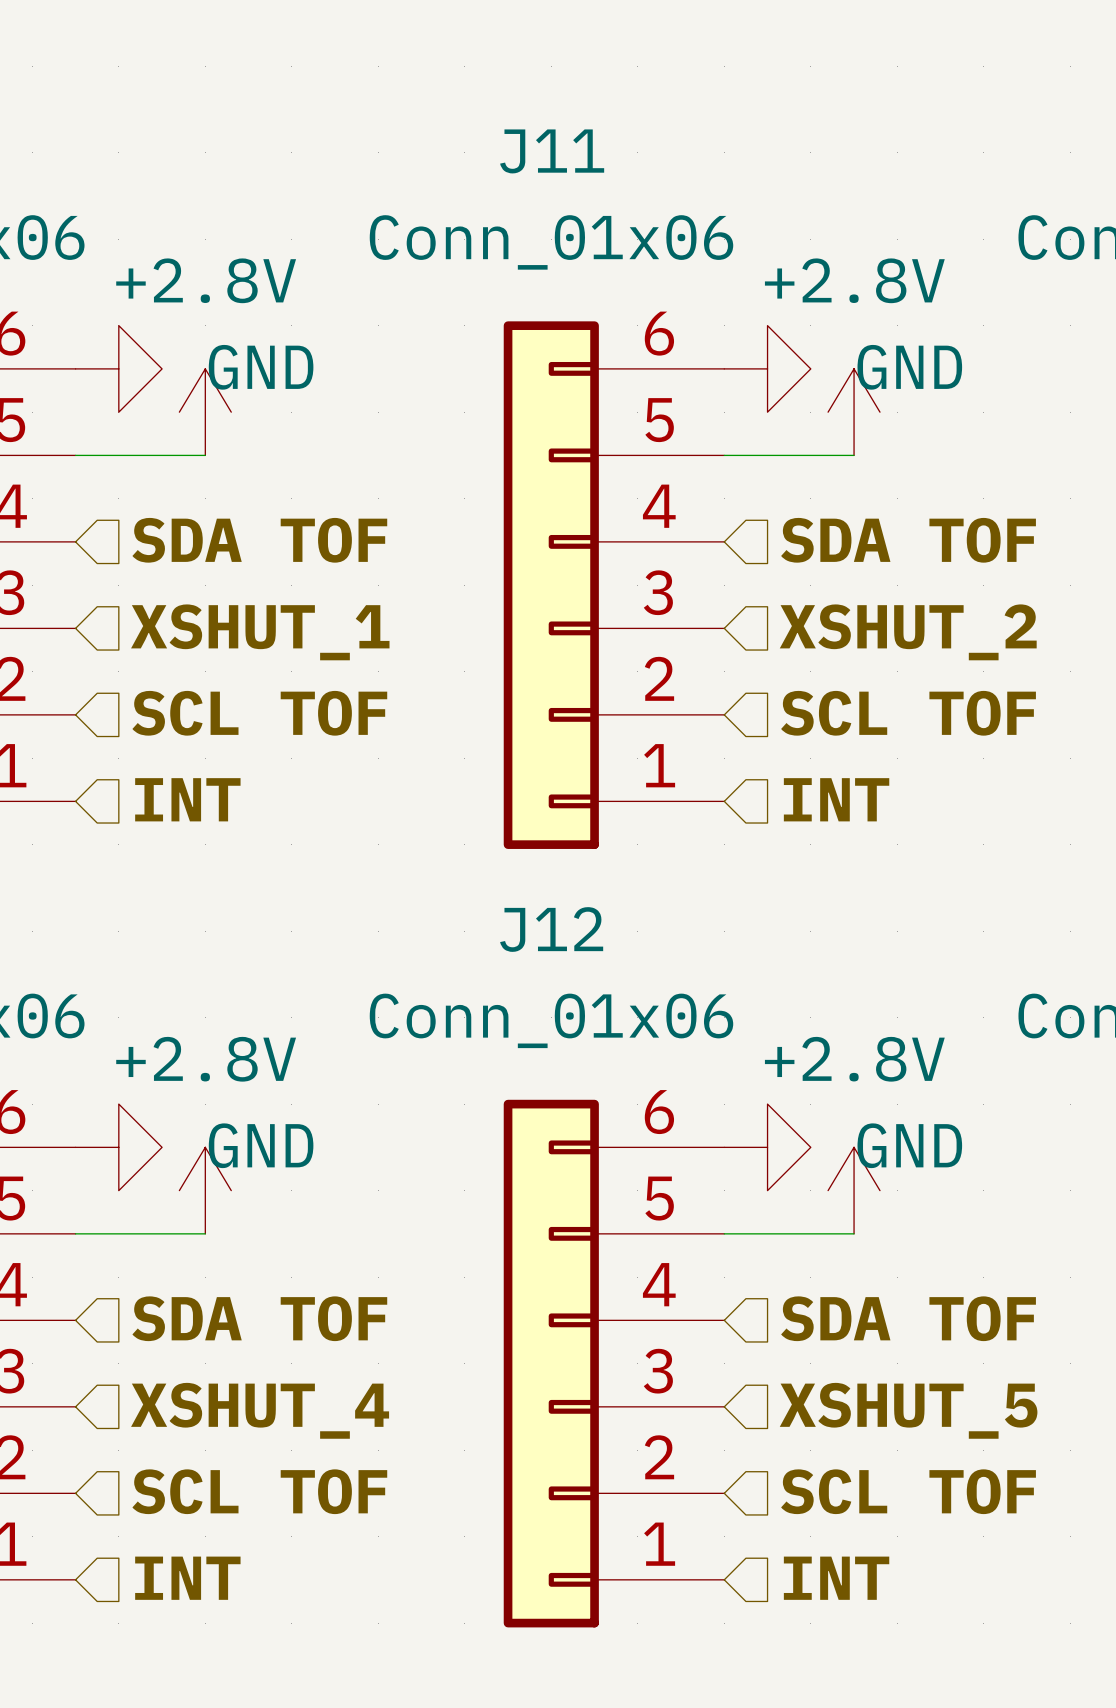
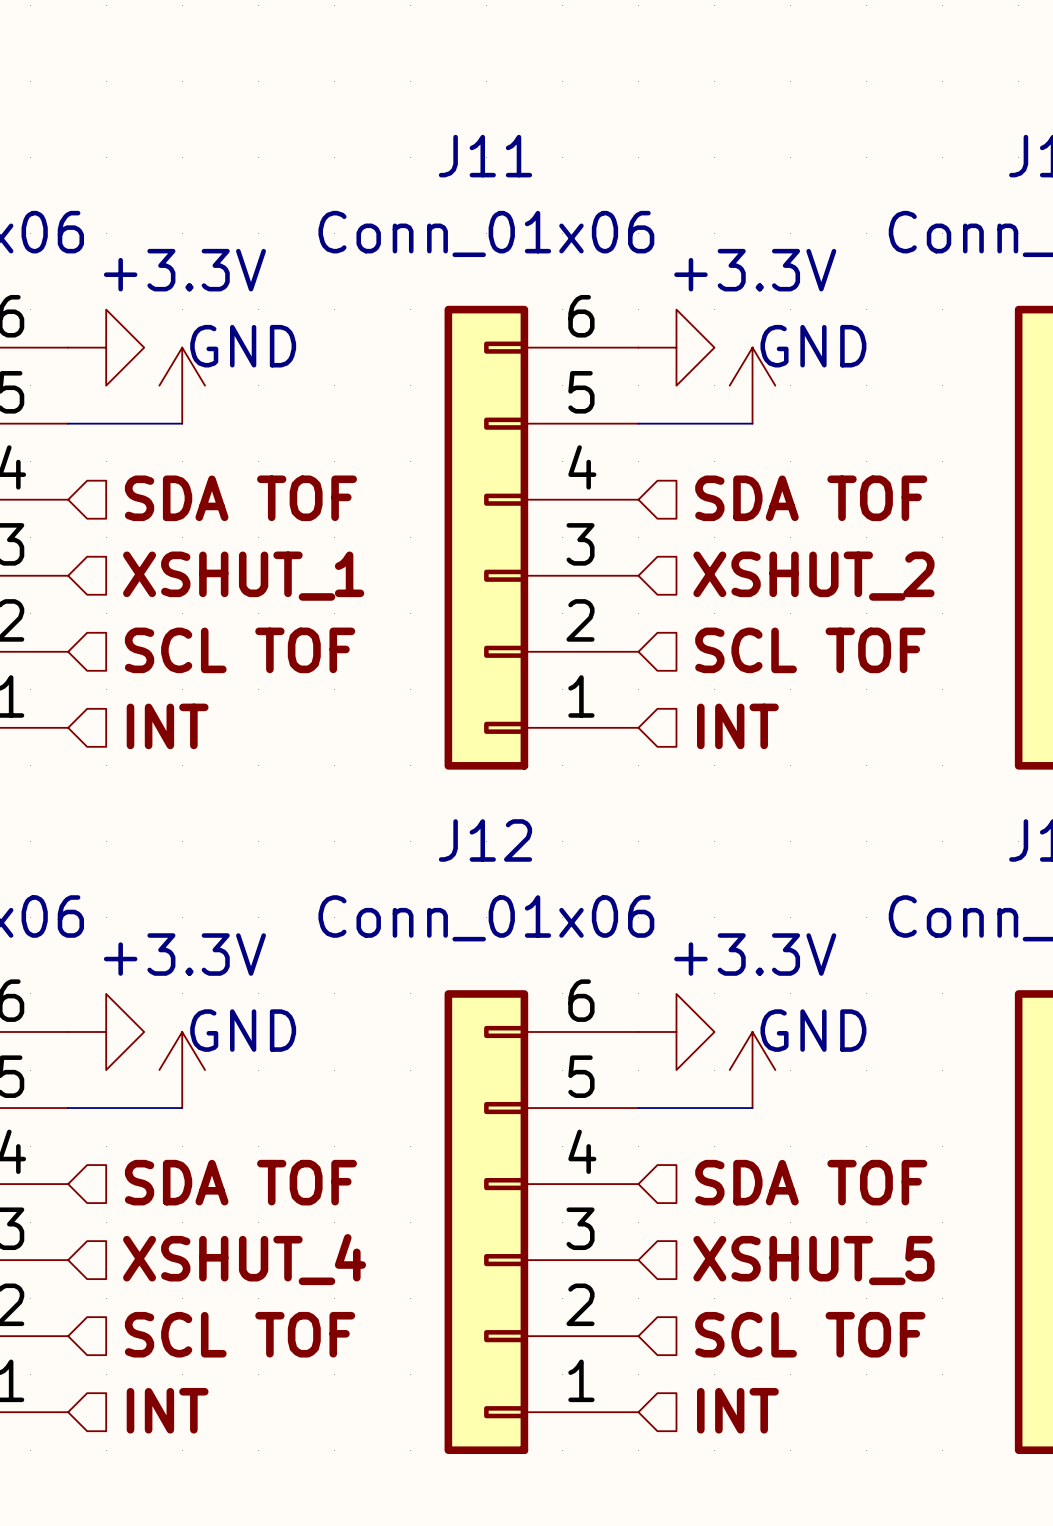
power symbol: +2.8V (205, 412) -> +3.3V (182, 385)
power symbol: +2.8V (854, 412) -> +3.3V (752, 385)
power symbol: +2.8V (205, 1190) -> +3.3V (182, 1070)
power symbol: +2.8V (854, 1190) -> +3.3V (752, 1070)

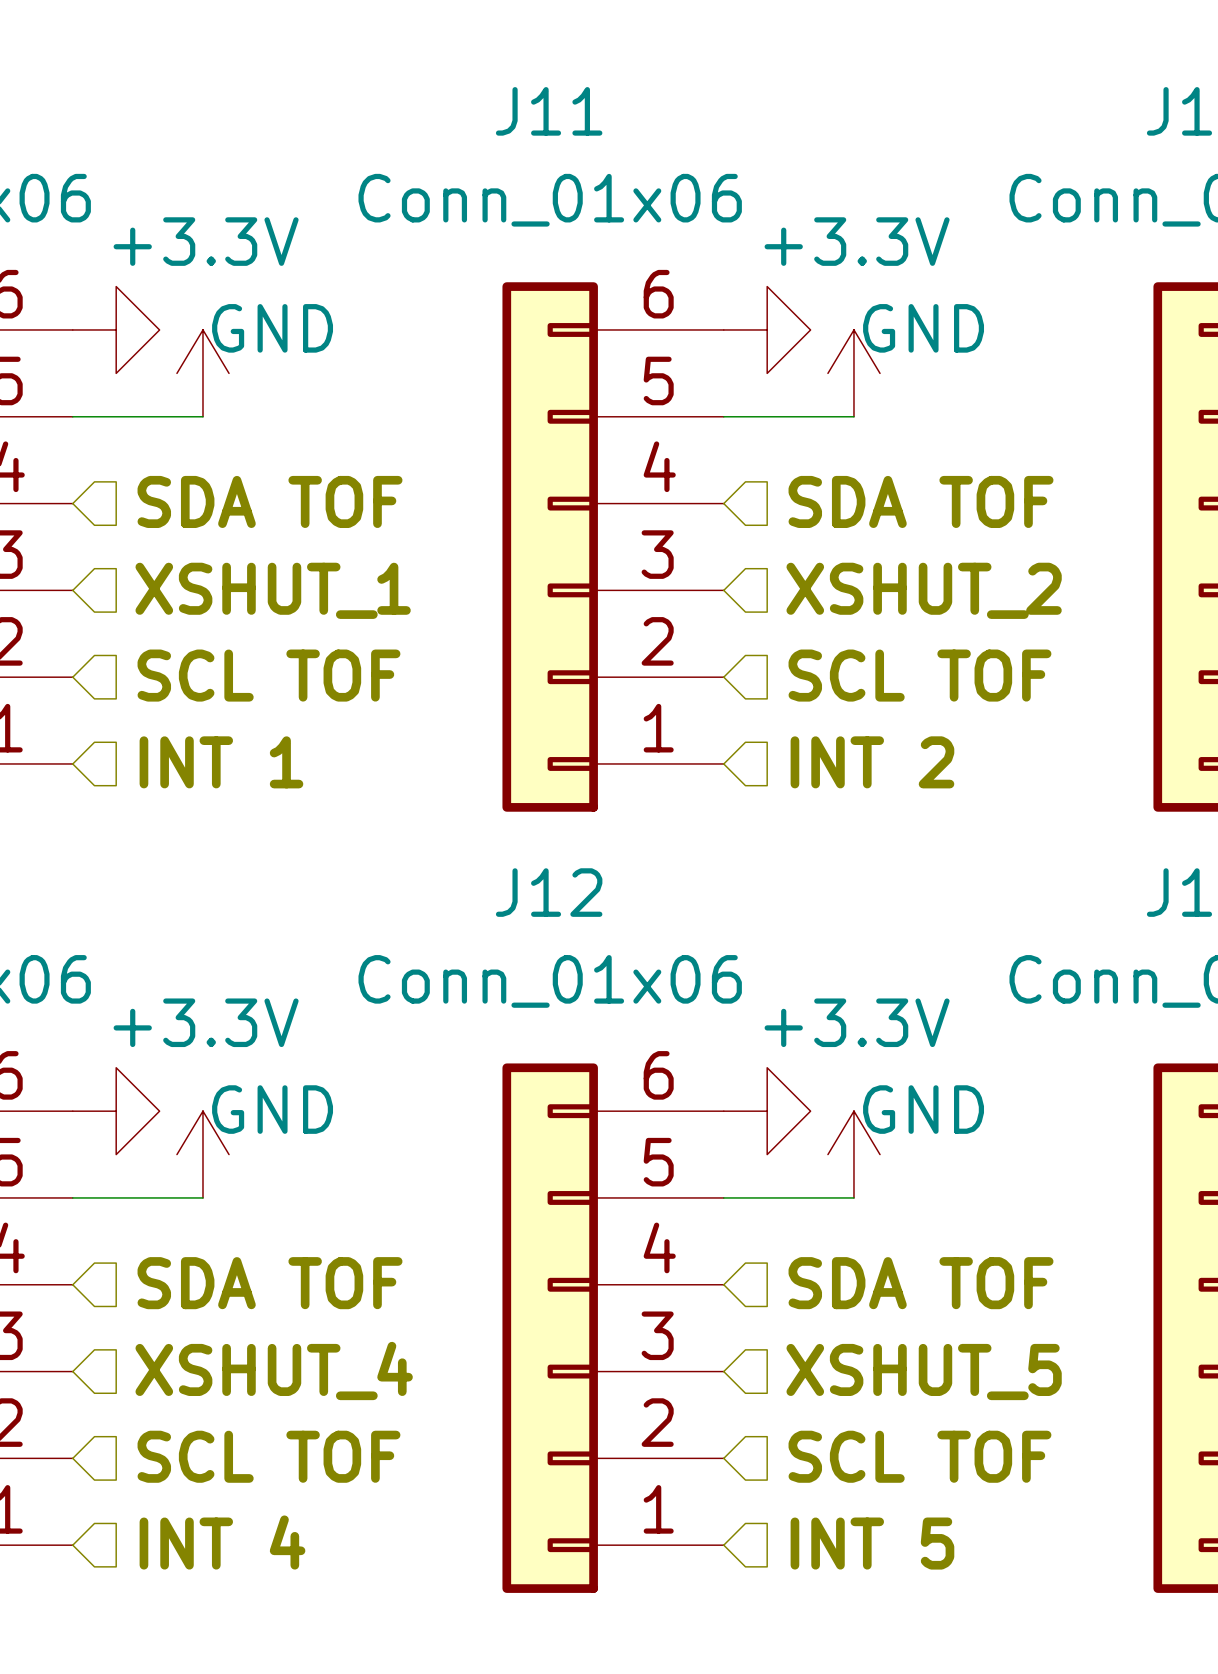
hierarchical label: INT (167, 726) -> INT 1 (221, 762)
hierarchical label: INT (737, 726) -> INT 2 (872, 762)
hierarchical label: INT (167, 1410) -> INT 4 (222, 1542)
hierarchical label: INT (737, 1410) -> INT 5 (872, 1543)

